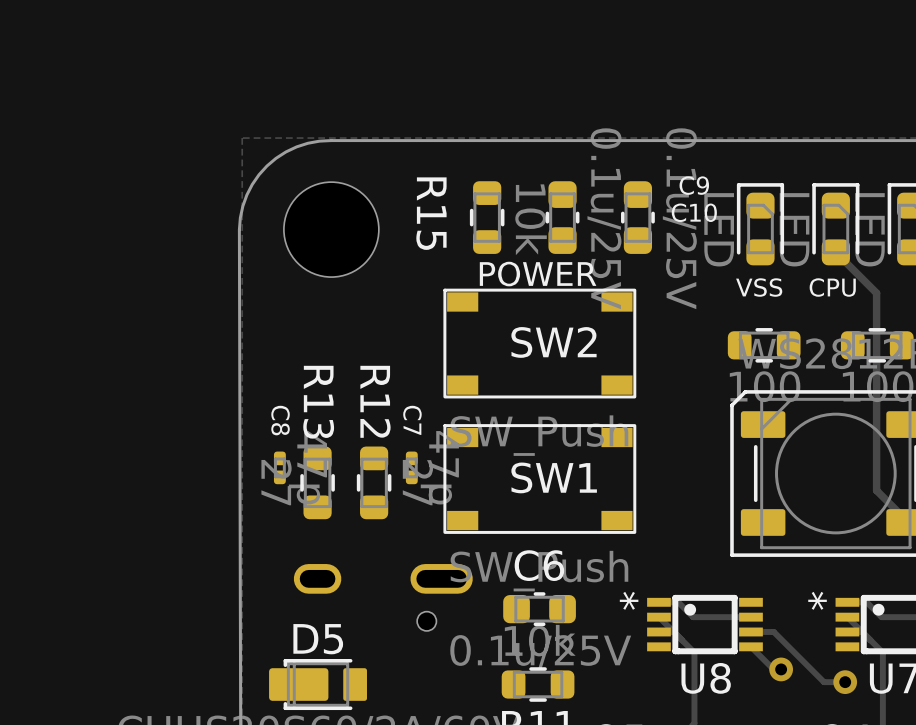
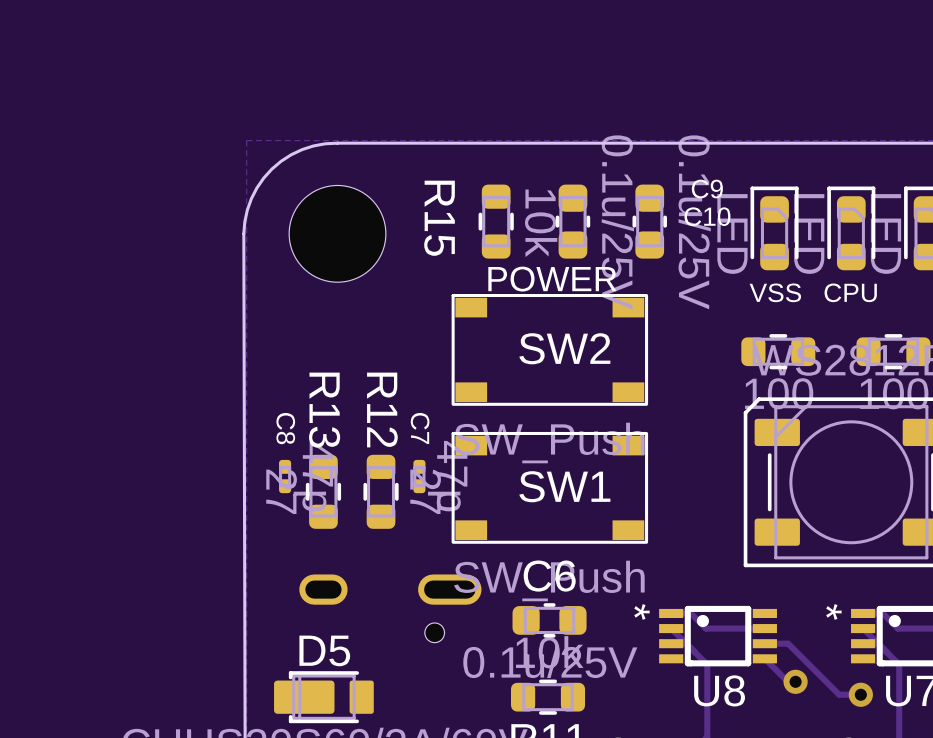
track: (835, 252) (876, 293) (876, 490) (908, 522) -> none

